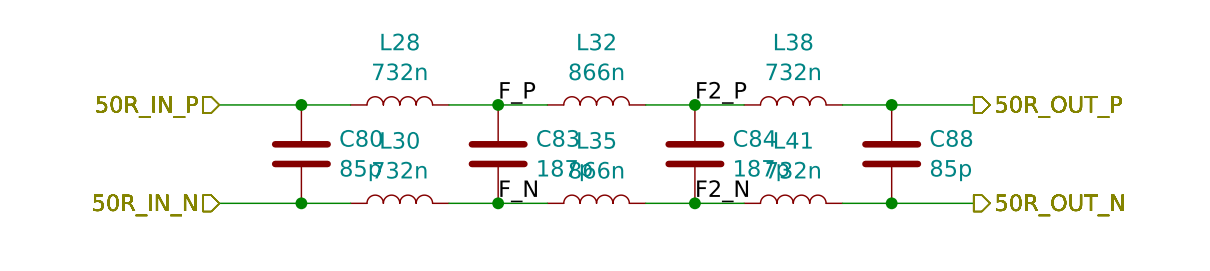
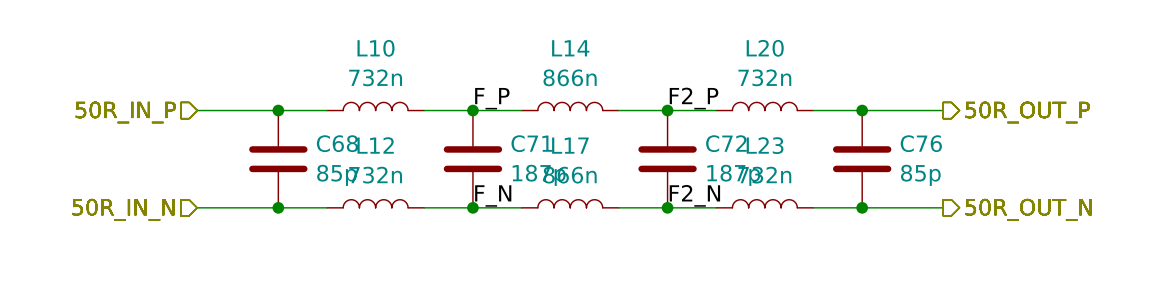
L28 name: L28 (400, 42) -> L10 (376, 48)
L32 name: L32 (596, 42) -> L14 (570, 48)
L38 name: L38 (793, 42) -> L20 (765, 48)
C80 name: C80 (361, 138) -> C68 (337, 143)
C83 name: C83 (557, 138) -> C71 (531, 143)
C84 name: C84 (754, 138) -> C72 (726, 143)
C88 name: C88 (951, 138) -> C76 (921, 143)
L30 name: L30 (400, 140) -> L12 (375, 145)
L35 name: L35 (596, 140) -> L17 (570, 145)
L41 name: L41 (793, 140) -> L23 (765, 145)

